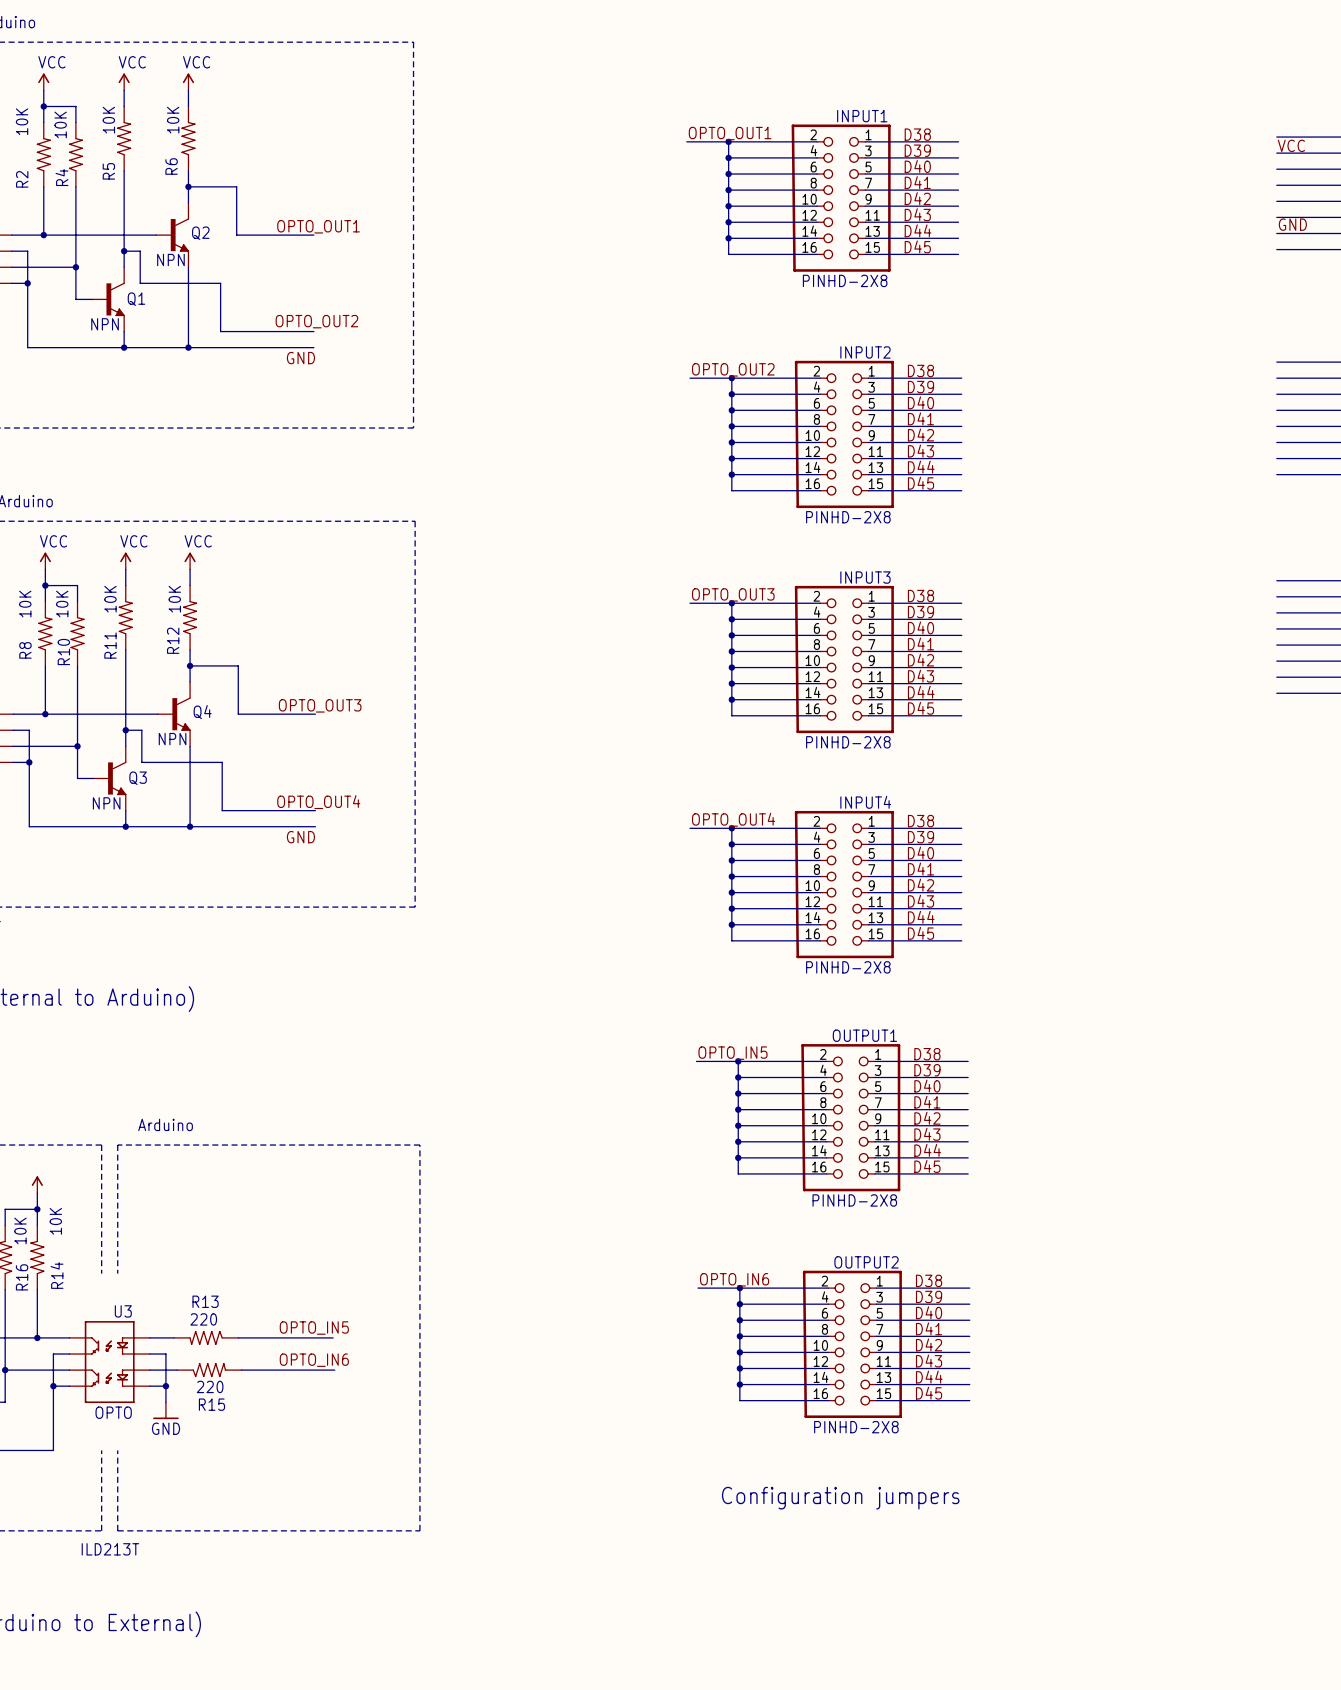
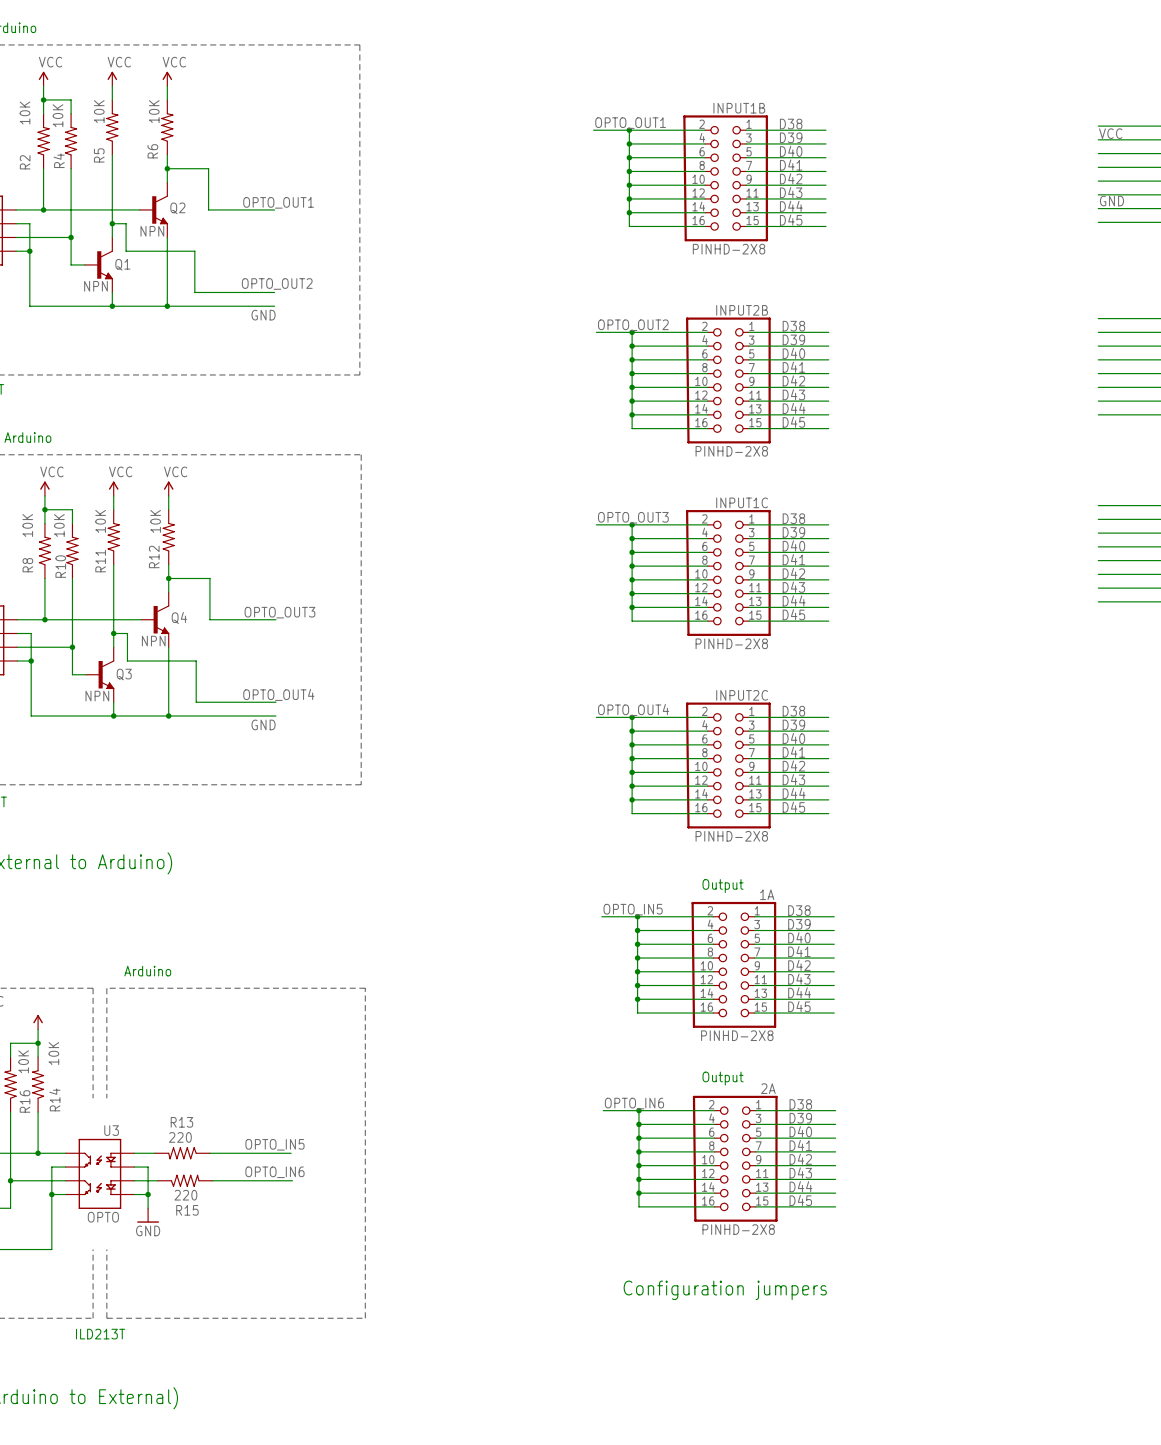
INPUT1 name: INPUT1 (862, 116) -> INPUT1B (739, 108)
INPUT2 name: INPUT2 (865, 352) -> INPUT2B (742, 310)
INPUT3 name: INPUT3 (865, 577) -> INPUT1C (742, 502)
INPUT4 name: INPUT4 (865, 802) -> INPUT2C (742, 695)
text: none -> Output (723, 886)
OUTPUT1 name: OUTPUT1 (864, 1035) -> 1A (767, 894)
text: none -> Output (723, 1078)
OUTPUT2 name: OUTPUT2 (866, 1262) -> 2A (768, 1088)

